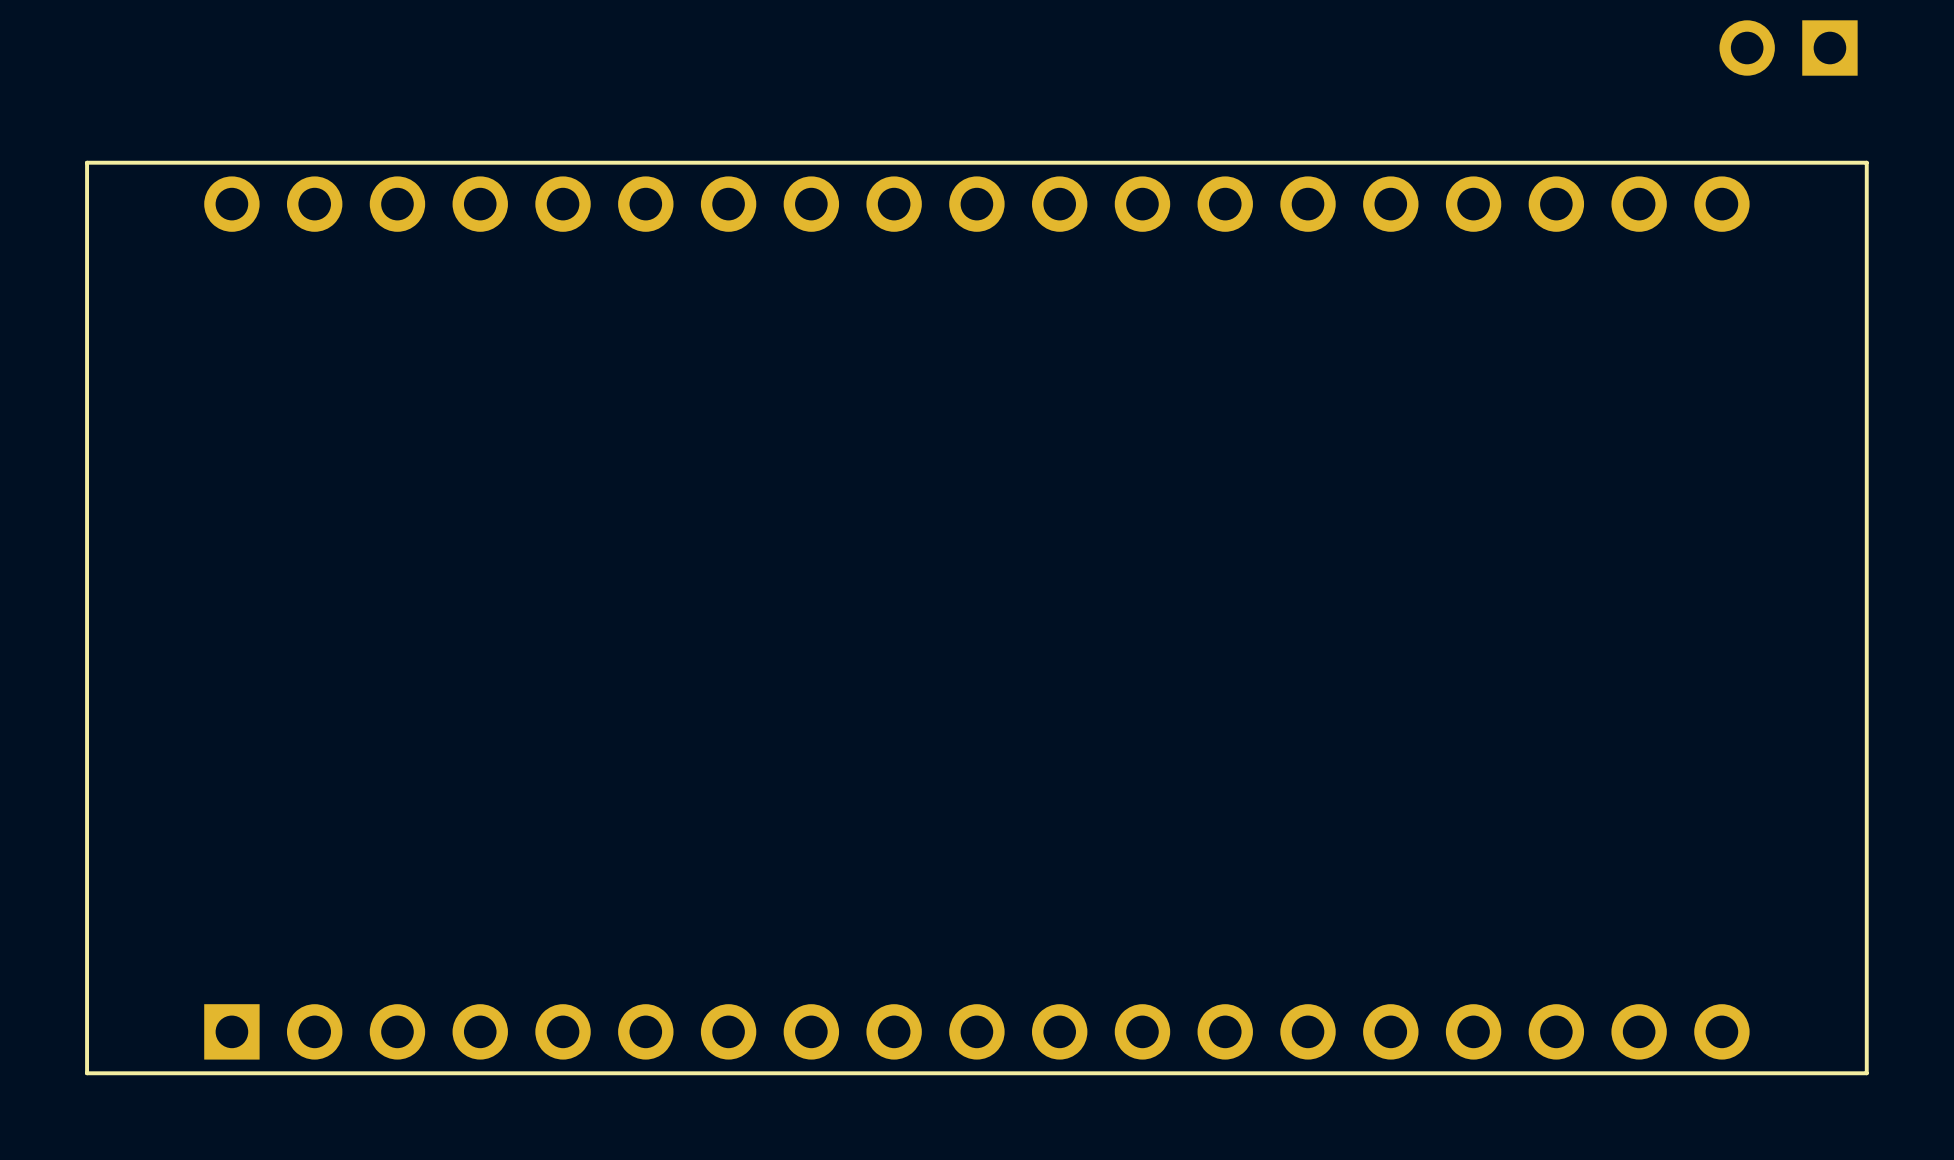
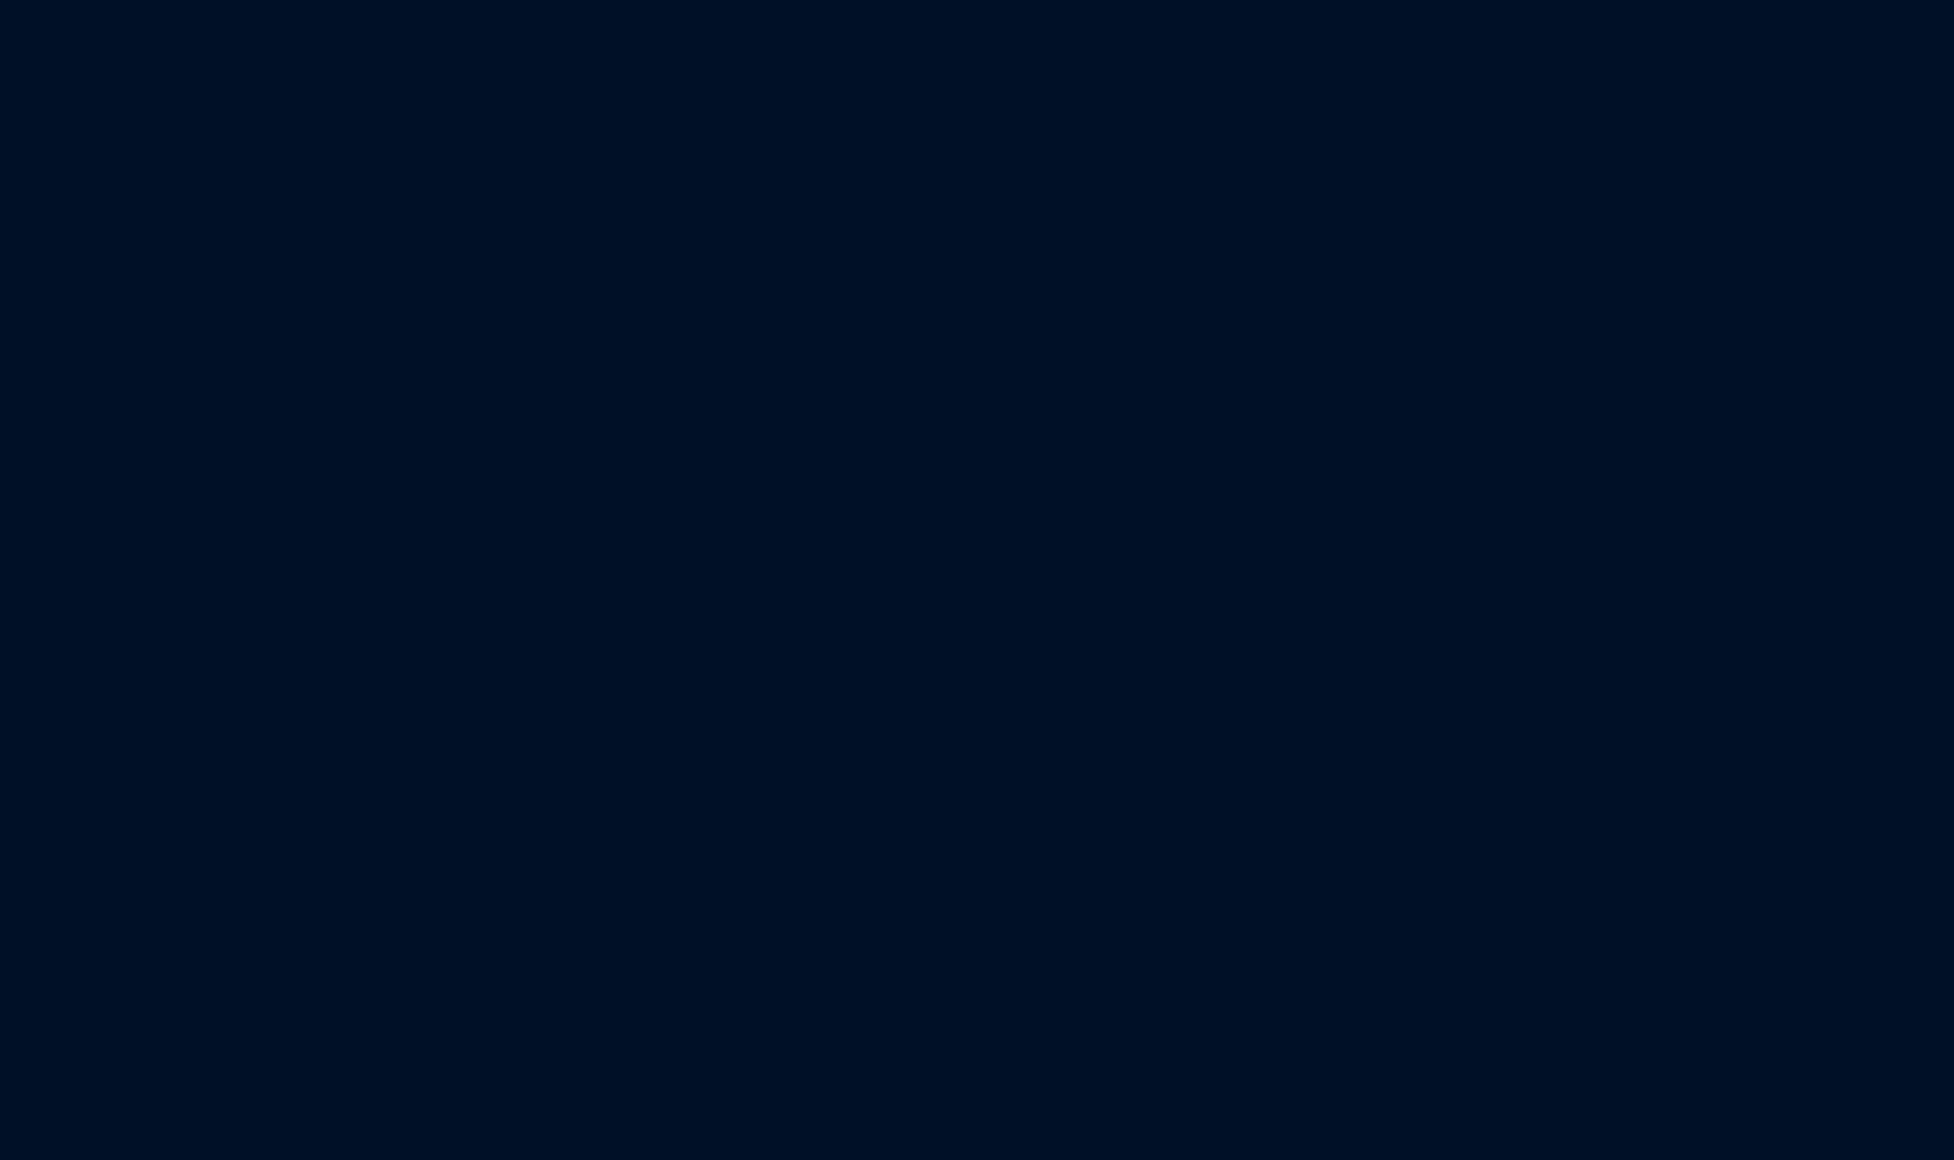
part: (1788, 48) -> none
part: (976, 617) -> none

